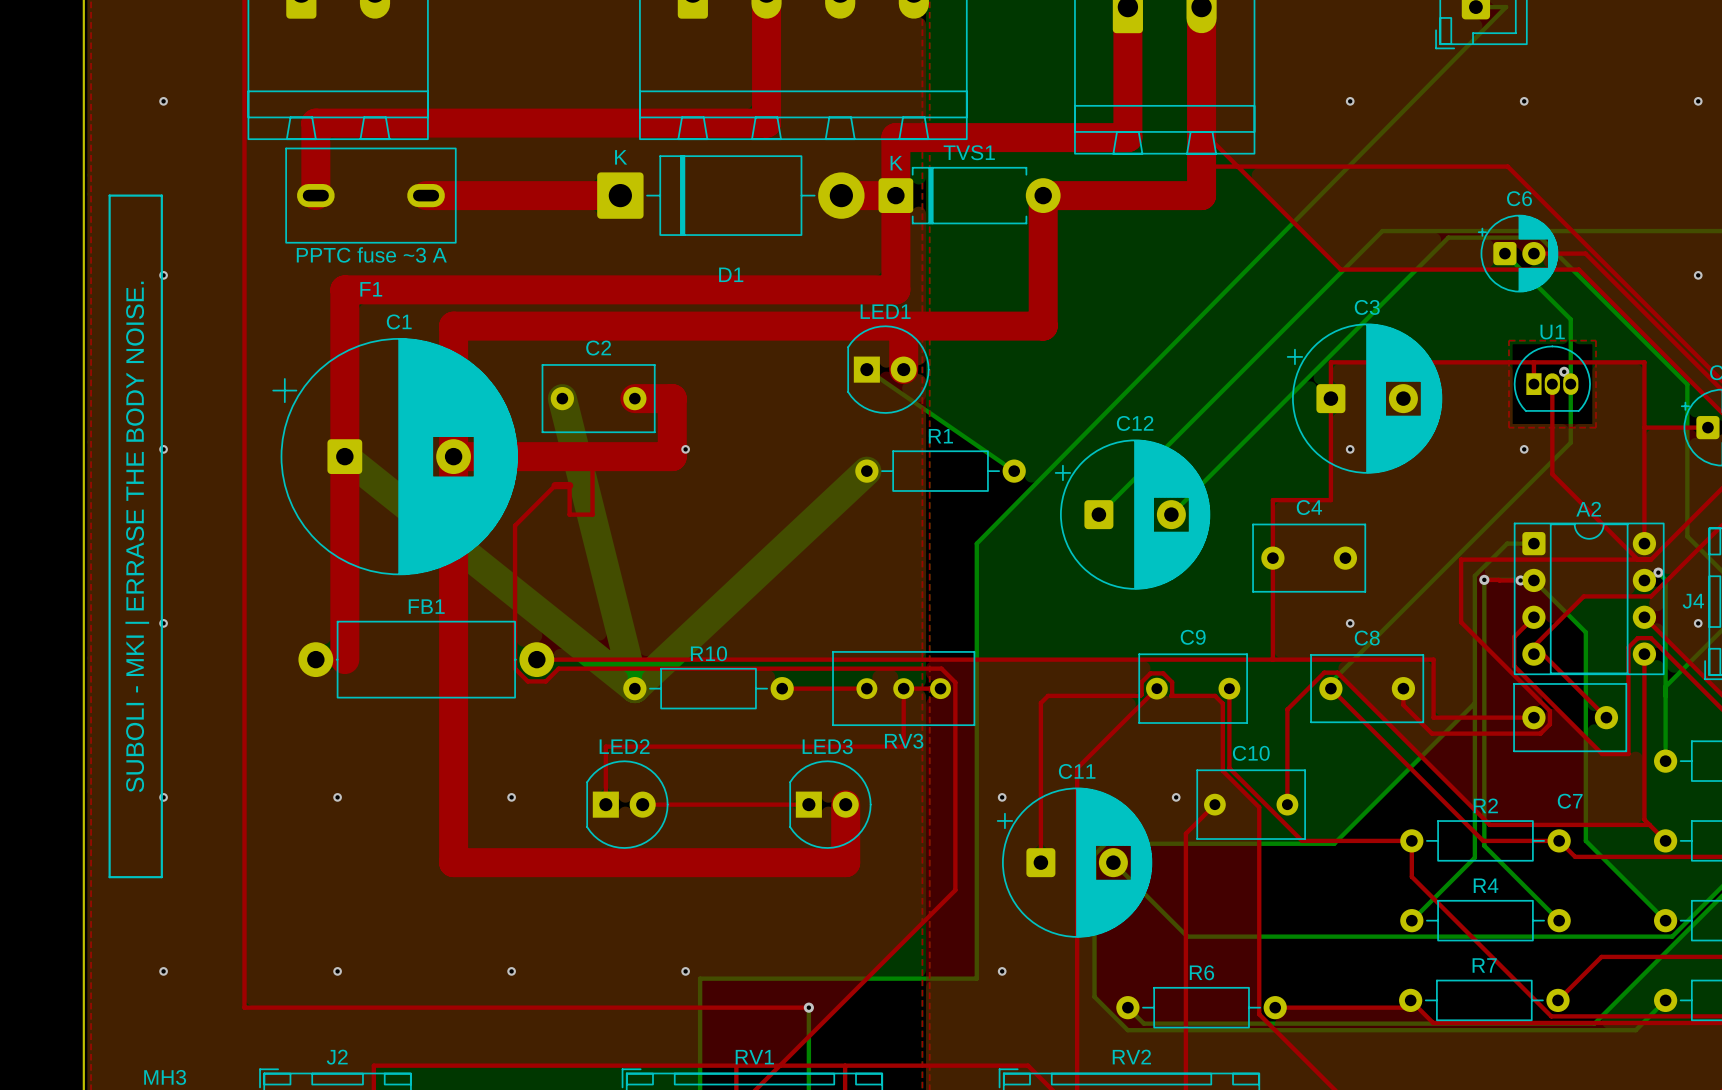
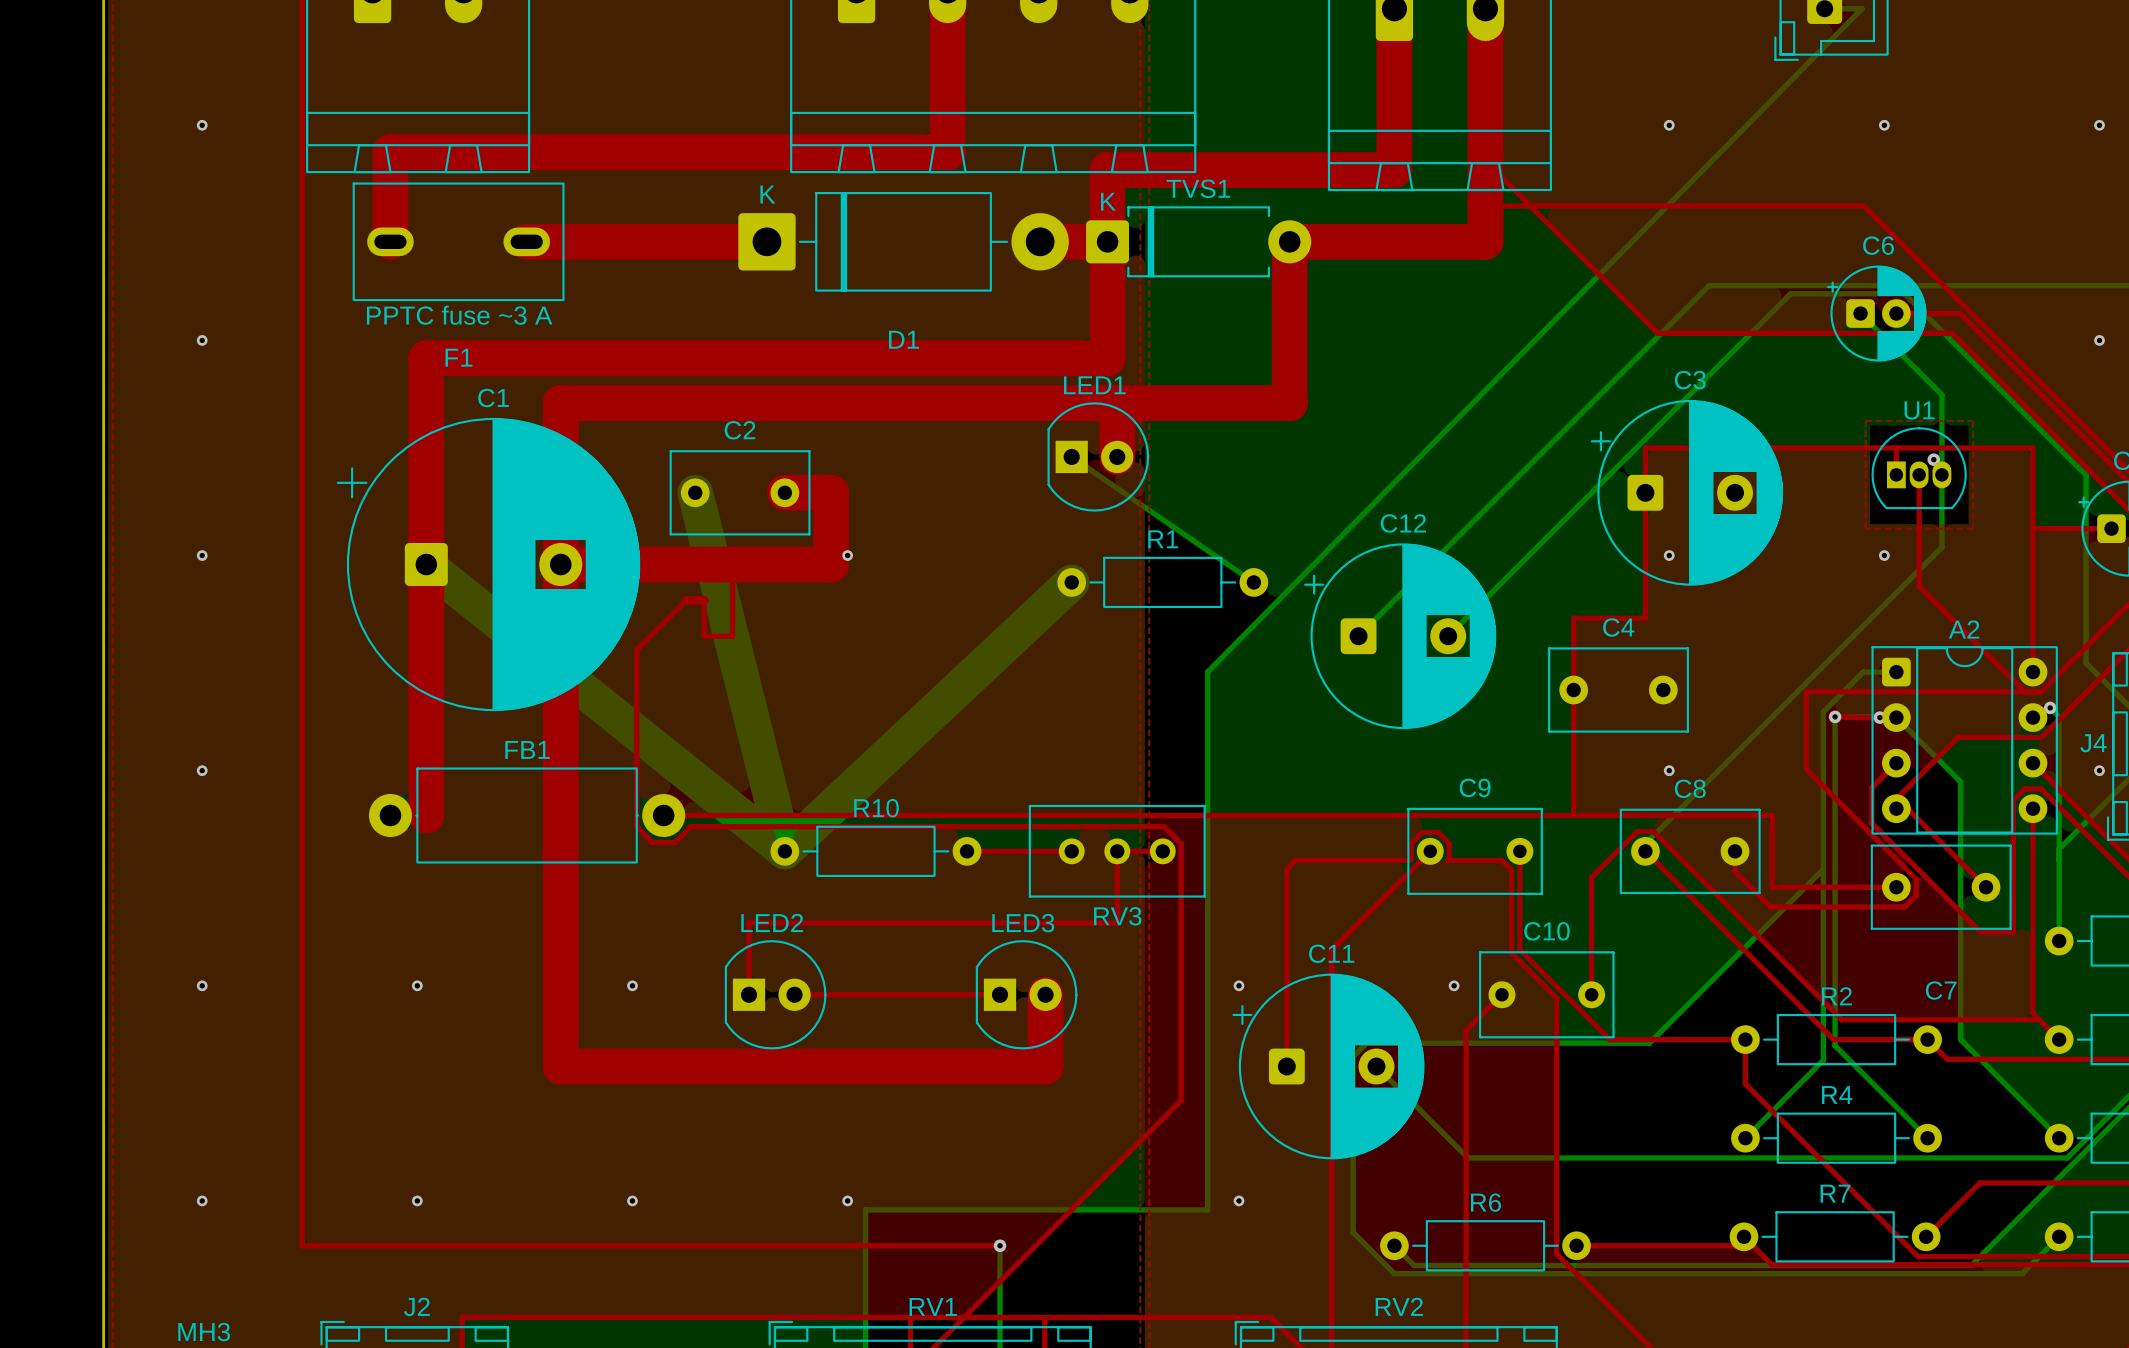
line: (109, 195) (161, 195) (161, 877) (109, 877) (109, 195) -> none
text: SUBOLI - MKI | ERRASE THE BODY NOISE. (137, 536) -> none

